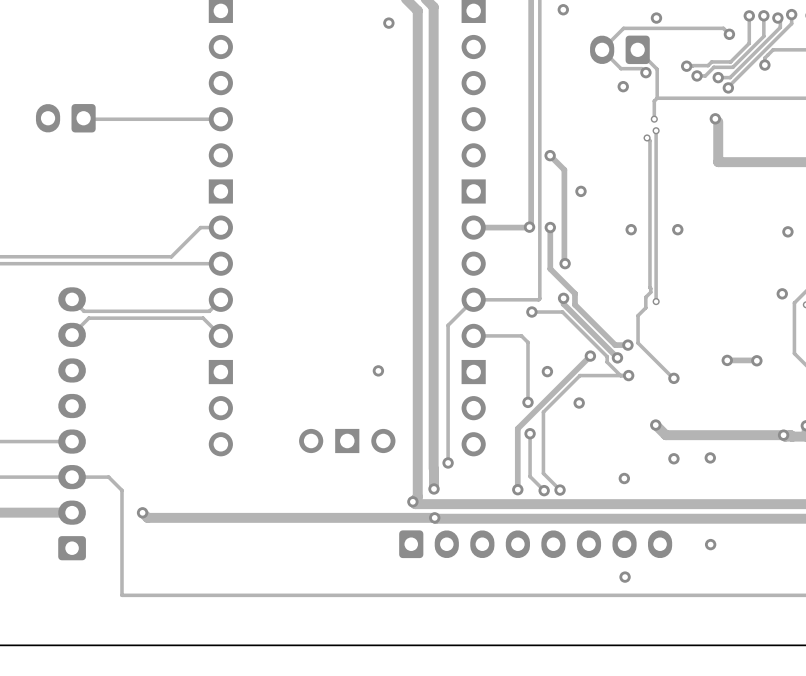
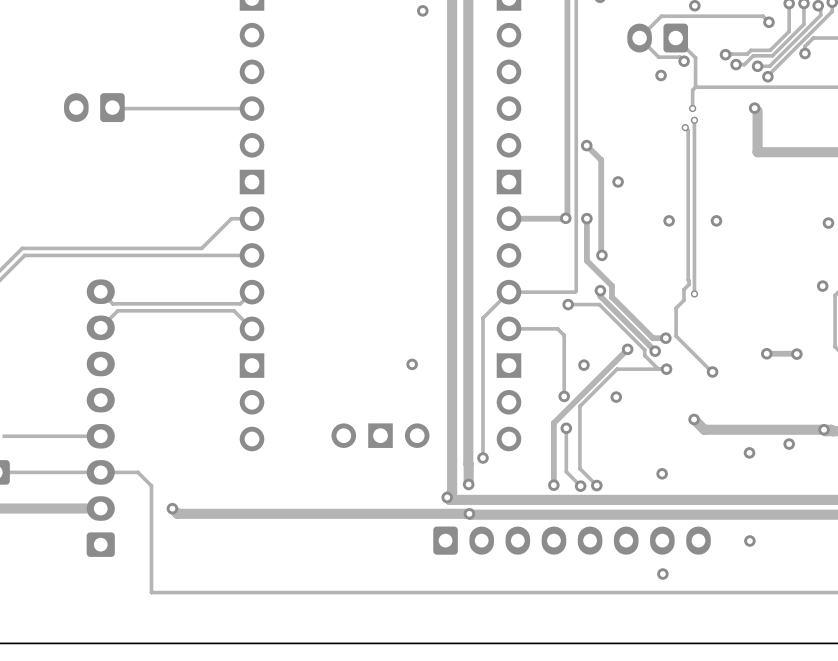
via: none -> (789, 444)
via: (673, 458) -> none

